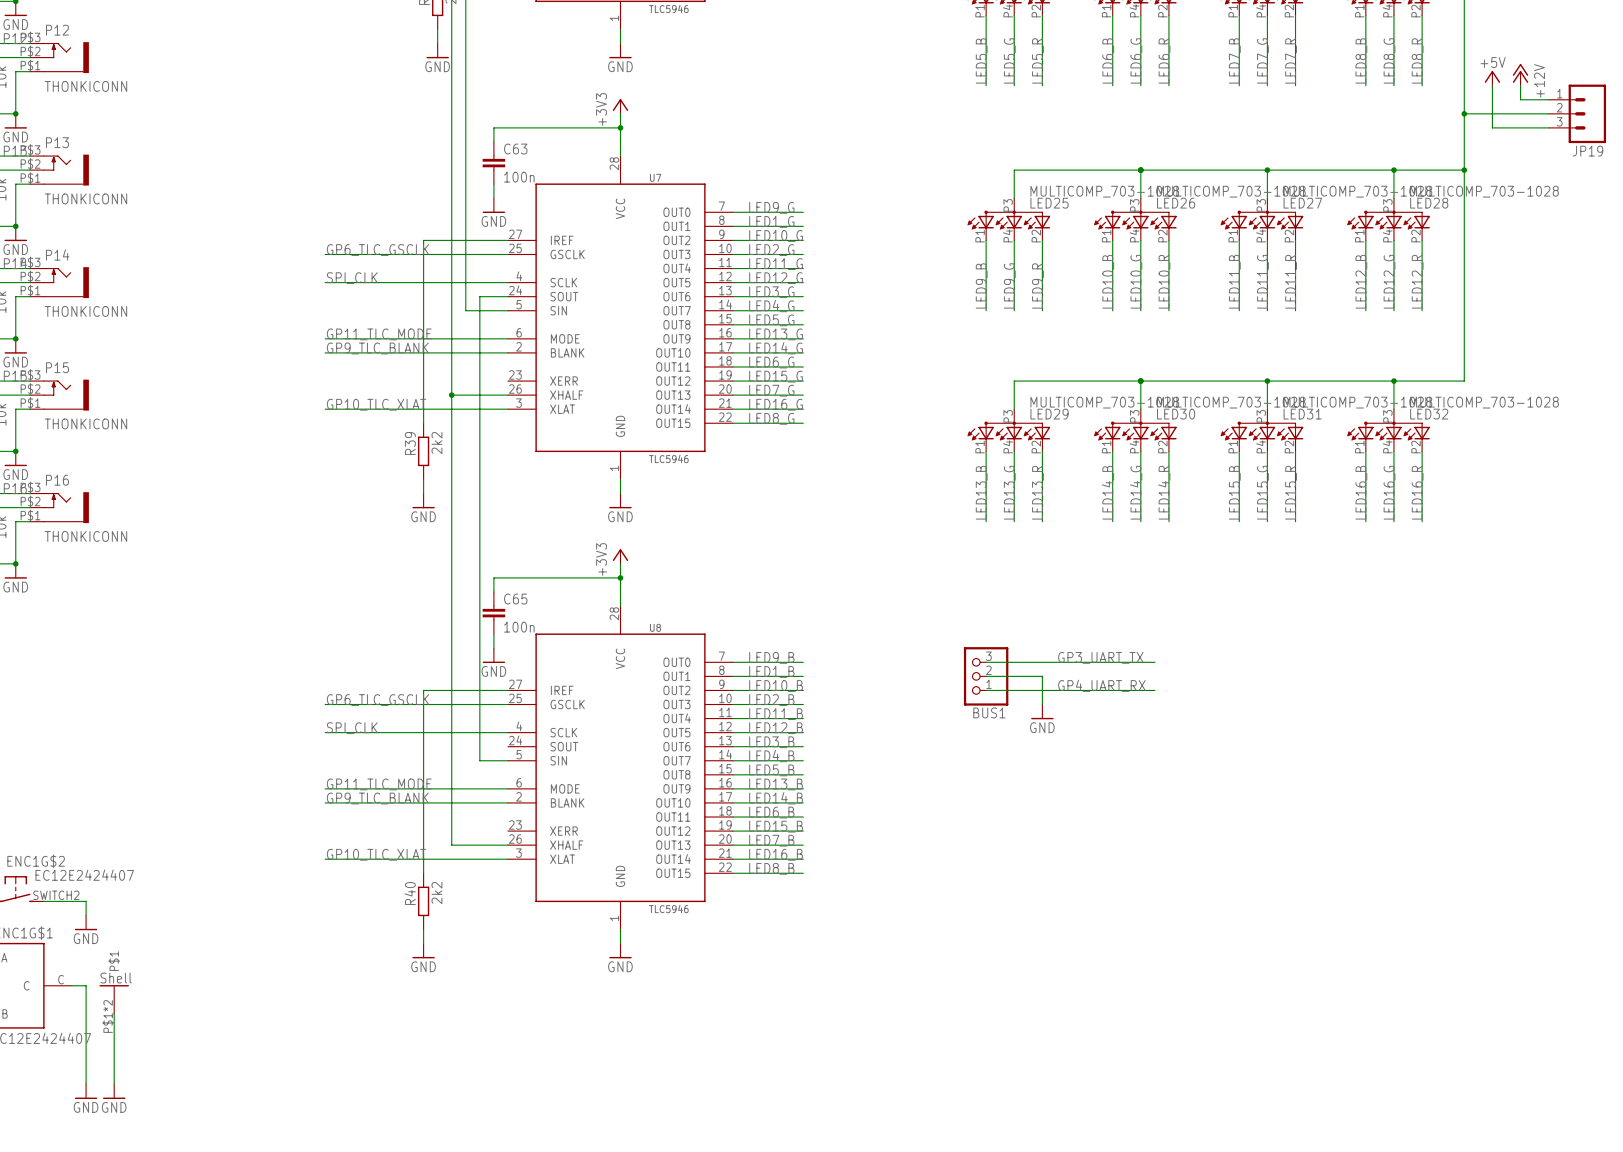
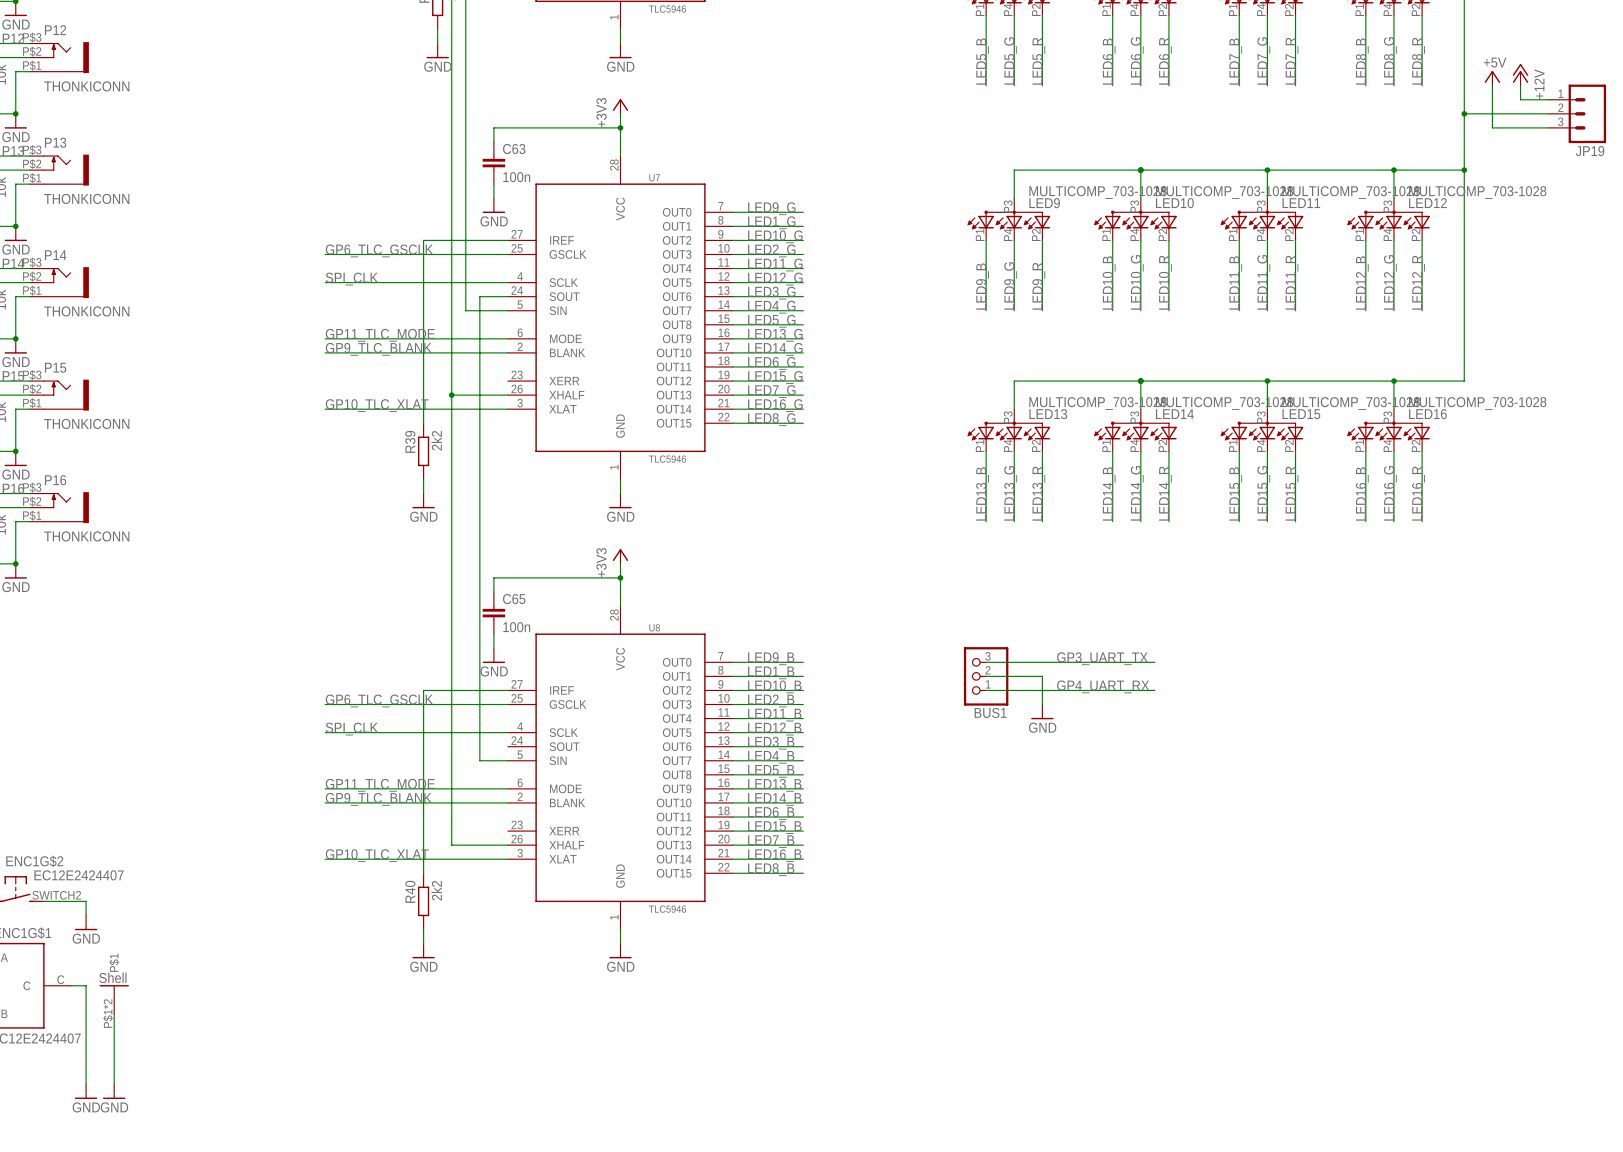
LED25 name: LED25 (1049, 203) -> LED9 (1044, 203)
LED26 name: LED26 (1176, 203) -> LED10 (1174, 203)
LED27 name: LED27 (1302, 203) -> LED11 (1301, 203)
LED28 name: LED28 (1429, 203) -> LED12 (1427, 203)
LED29 name: LED29 (1049, 414) -> LED13 (1048, 414)
LED30 name: LED30 (1176, 414) -> LED14 (1174, 414)
LED31 name: LED31 (1302, 414) -> LED15 (1301, 414)
LED32 name: LED32 (1429, 414) -> LED16 (1427, 414)

